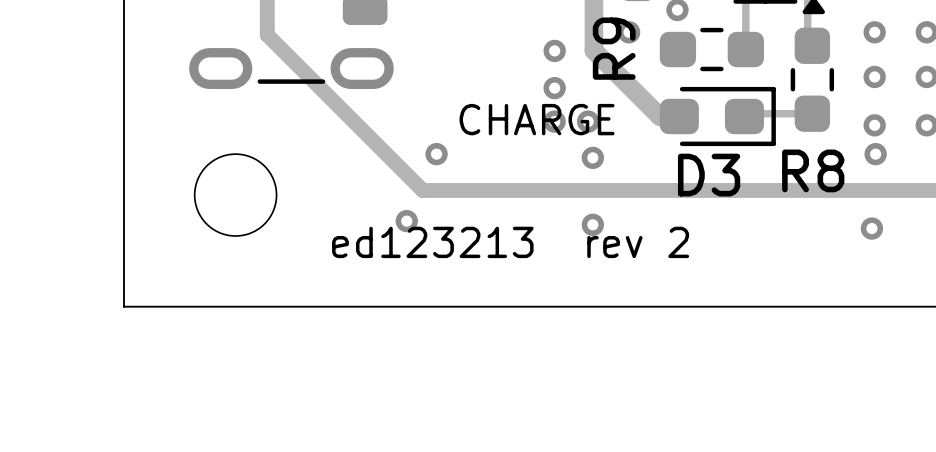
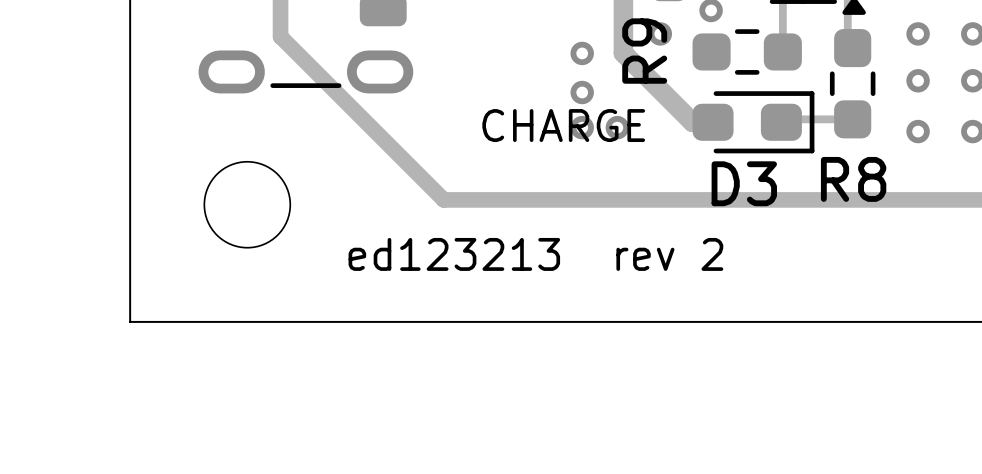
via: (436, 154) -> none
via: (875, 154) -> none
via: (592, 157) -> none
via: (406, 221) -> none
via: (592, 224) -> none
via: (871, 228) -> none

